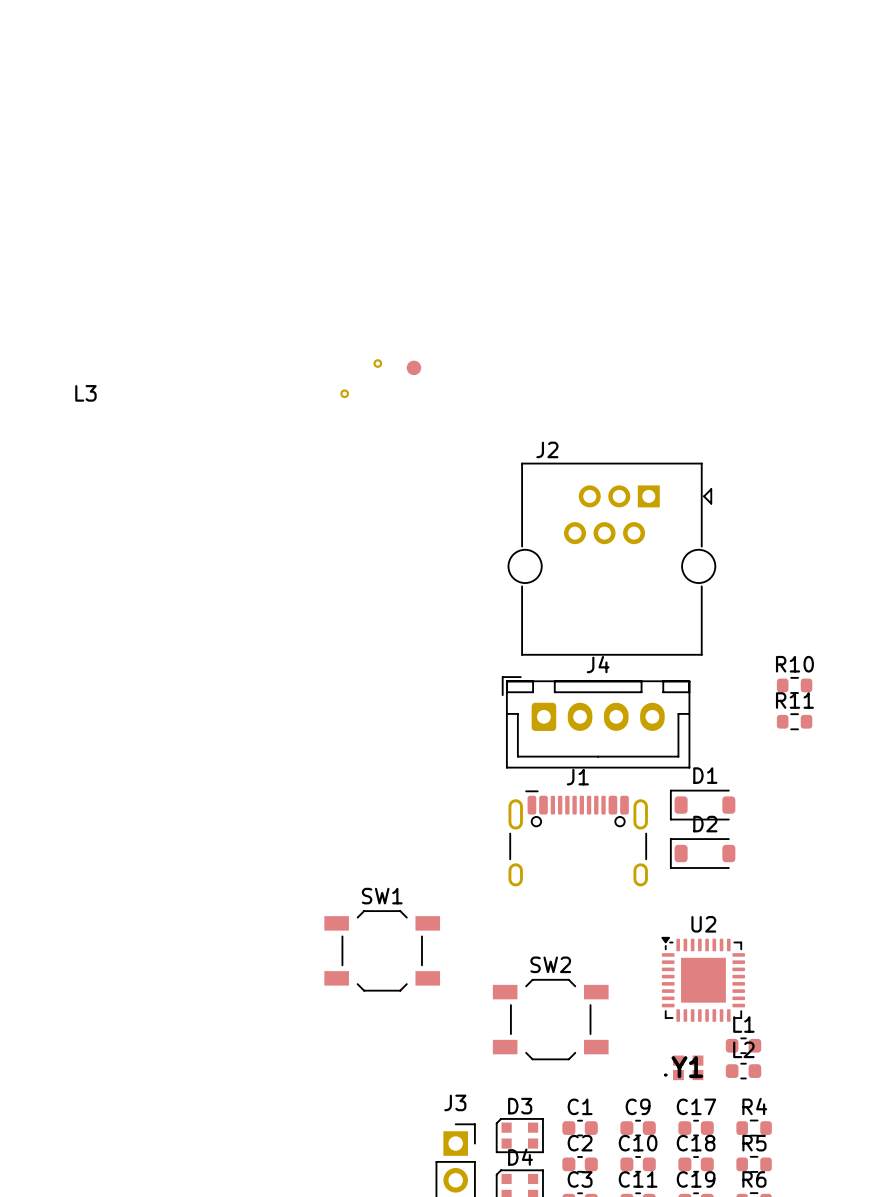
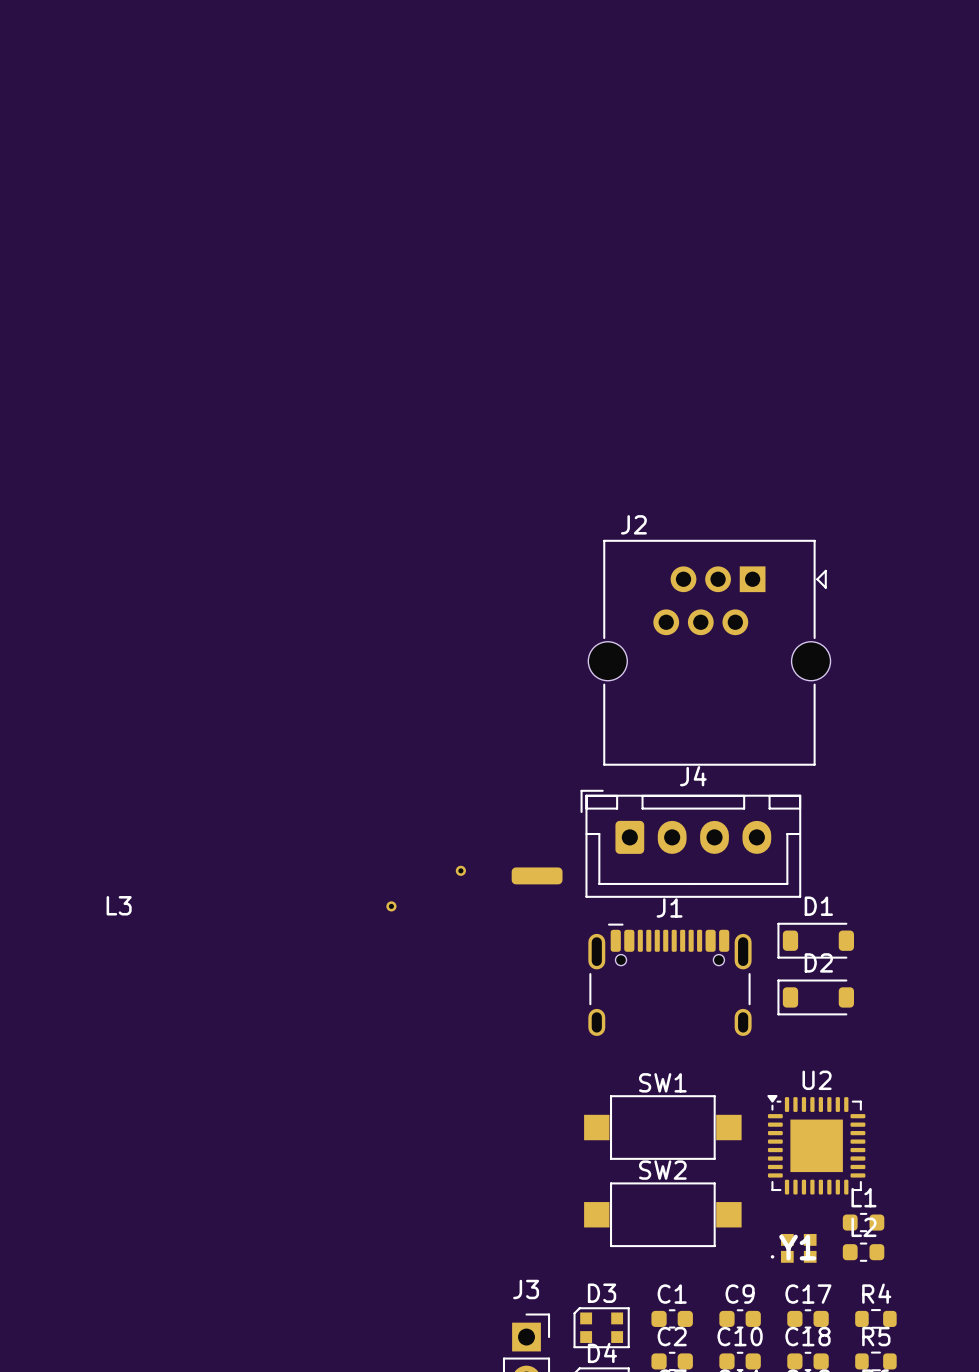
L3 footprint: [340, 359, 422, 399] -> [386, 865, 563, 912]
R10: (794, 685) -> none
R11: (794, 721) -> none
SW1 footprint: [324, 910, 441, 992] -> [584, 1095, 742, 1160]
SW2 footprint: [492, 978, 609, 1061] -> [584, 1182, 742, 1248]

